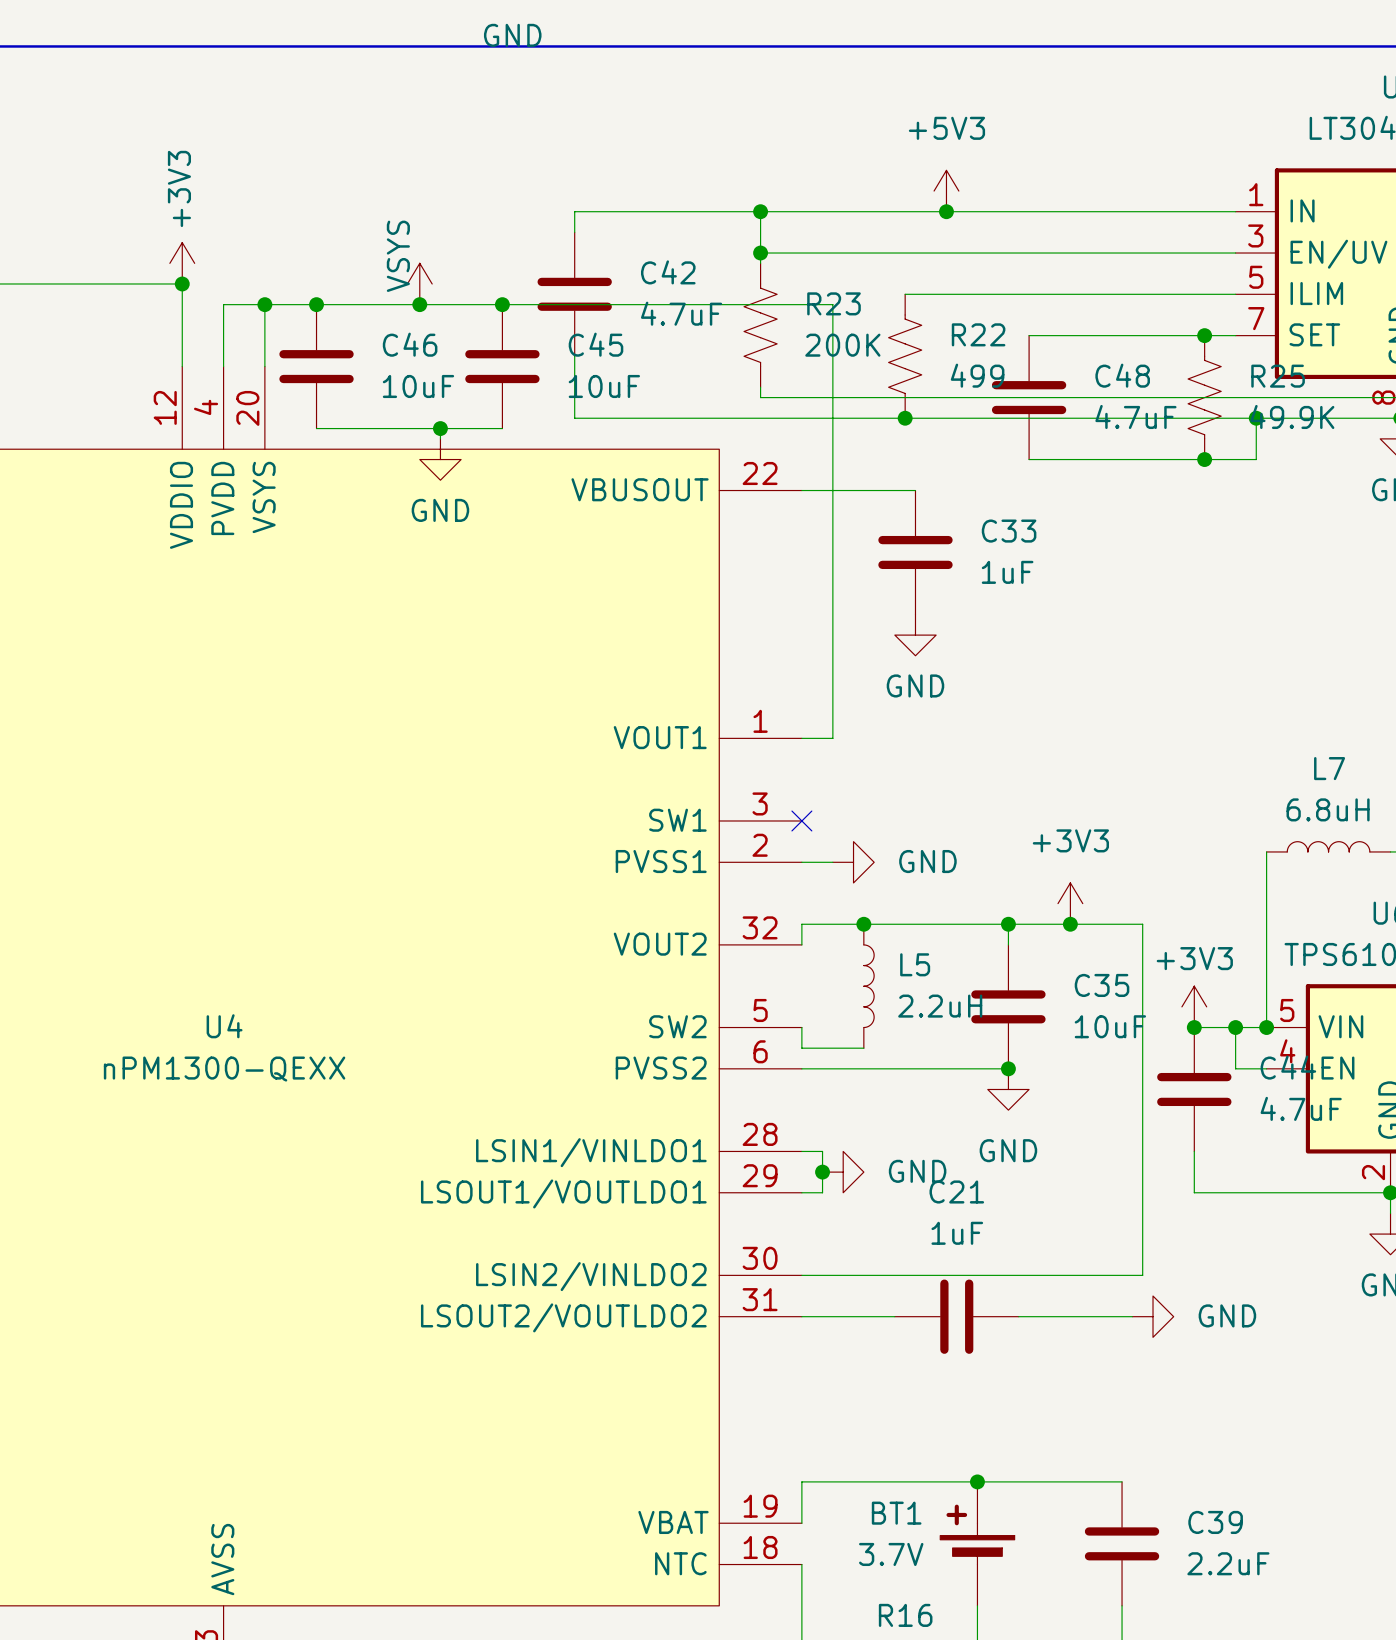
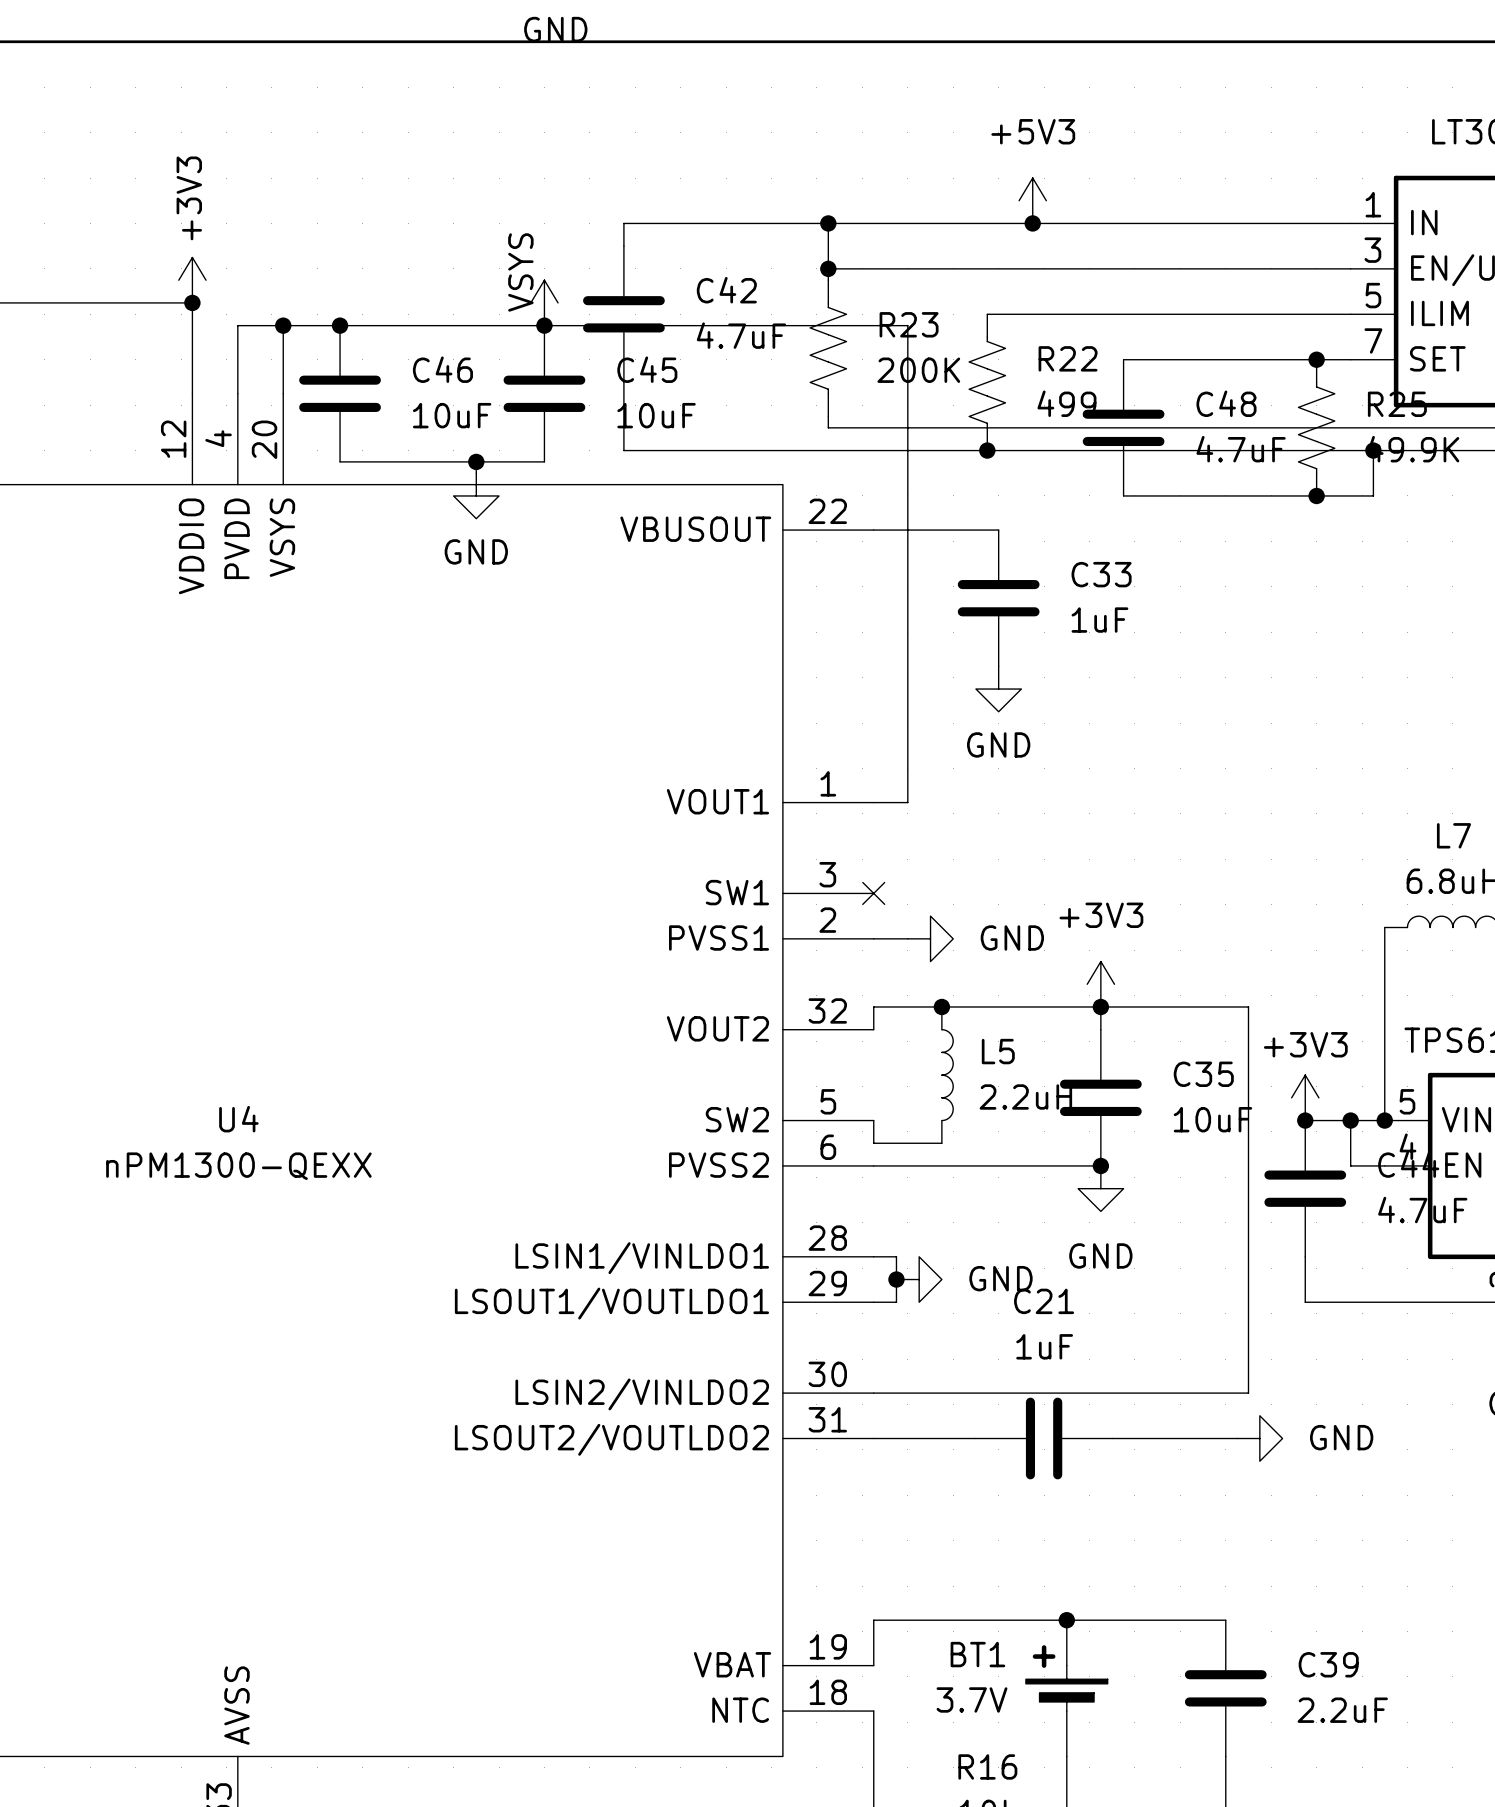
power symbol position: VSYS (419, 283) -> VSYS (544, 302)
junction: (419, 304) -> none
power symbol position: +3V3 (1070, 903) -> +3V3 (1100, 984)
junction: (1070, 924) -> none

